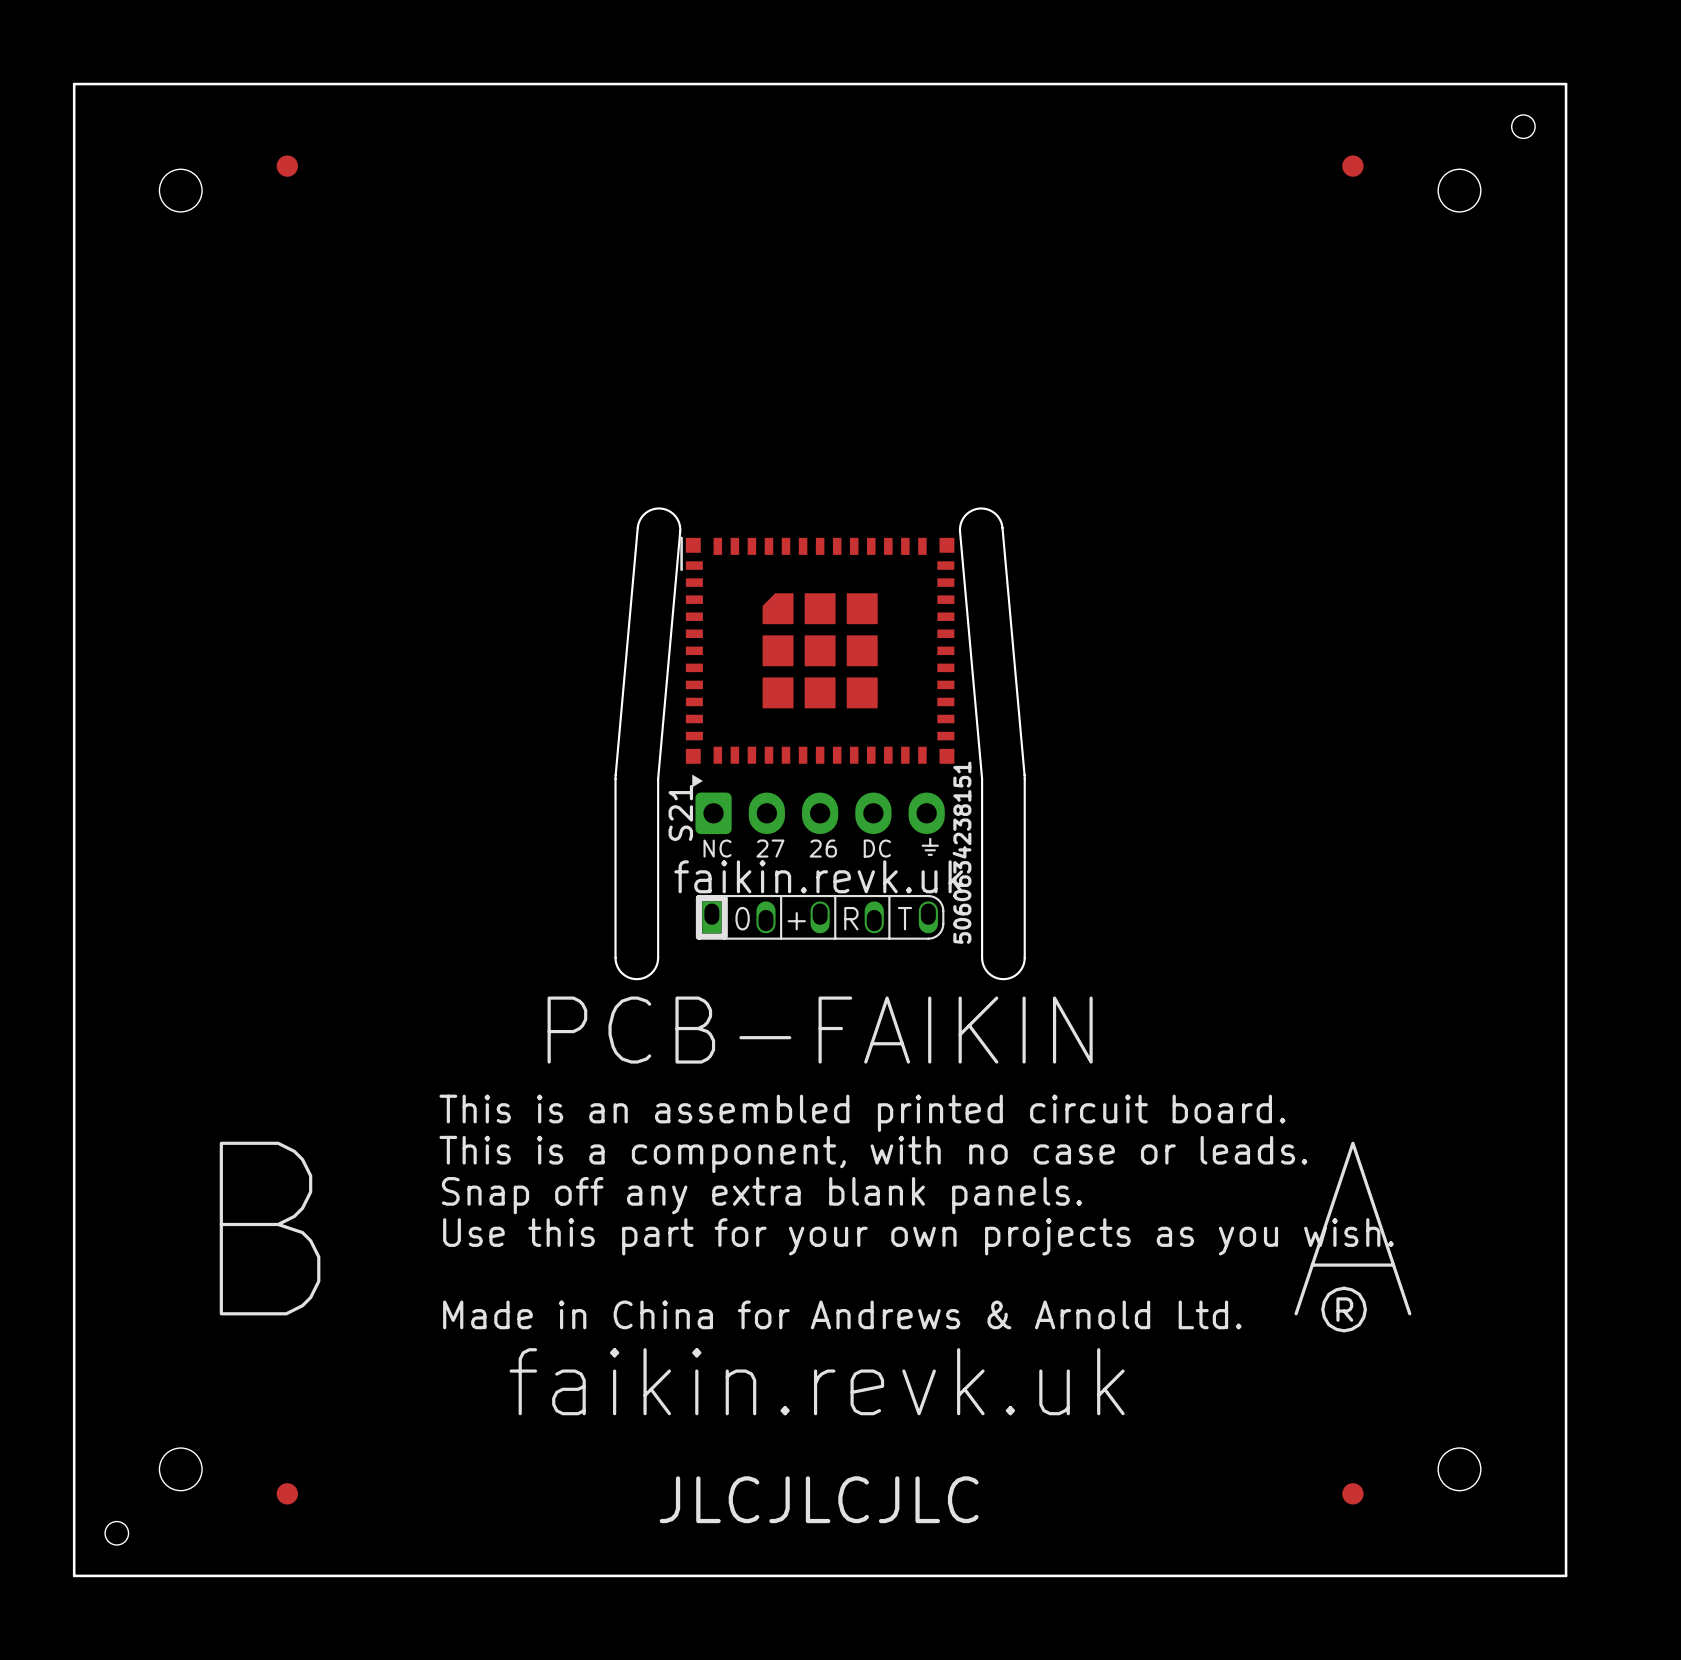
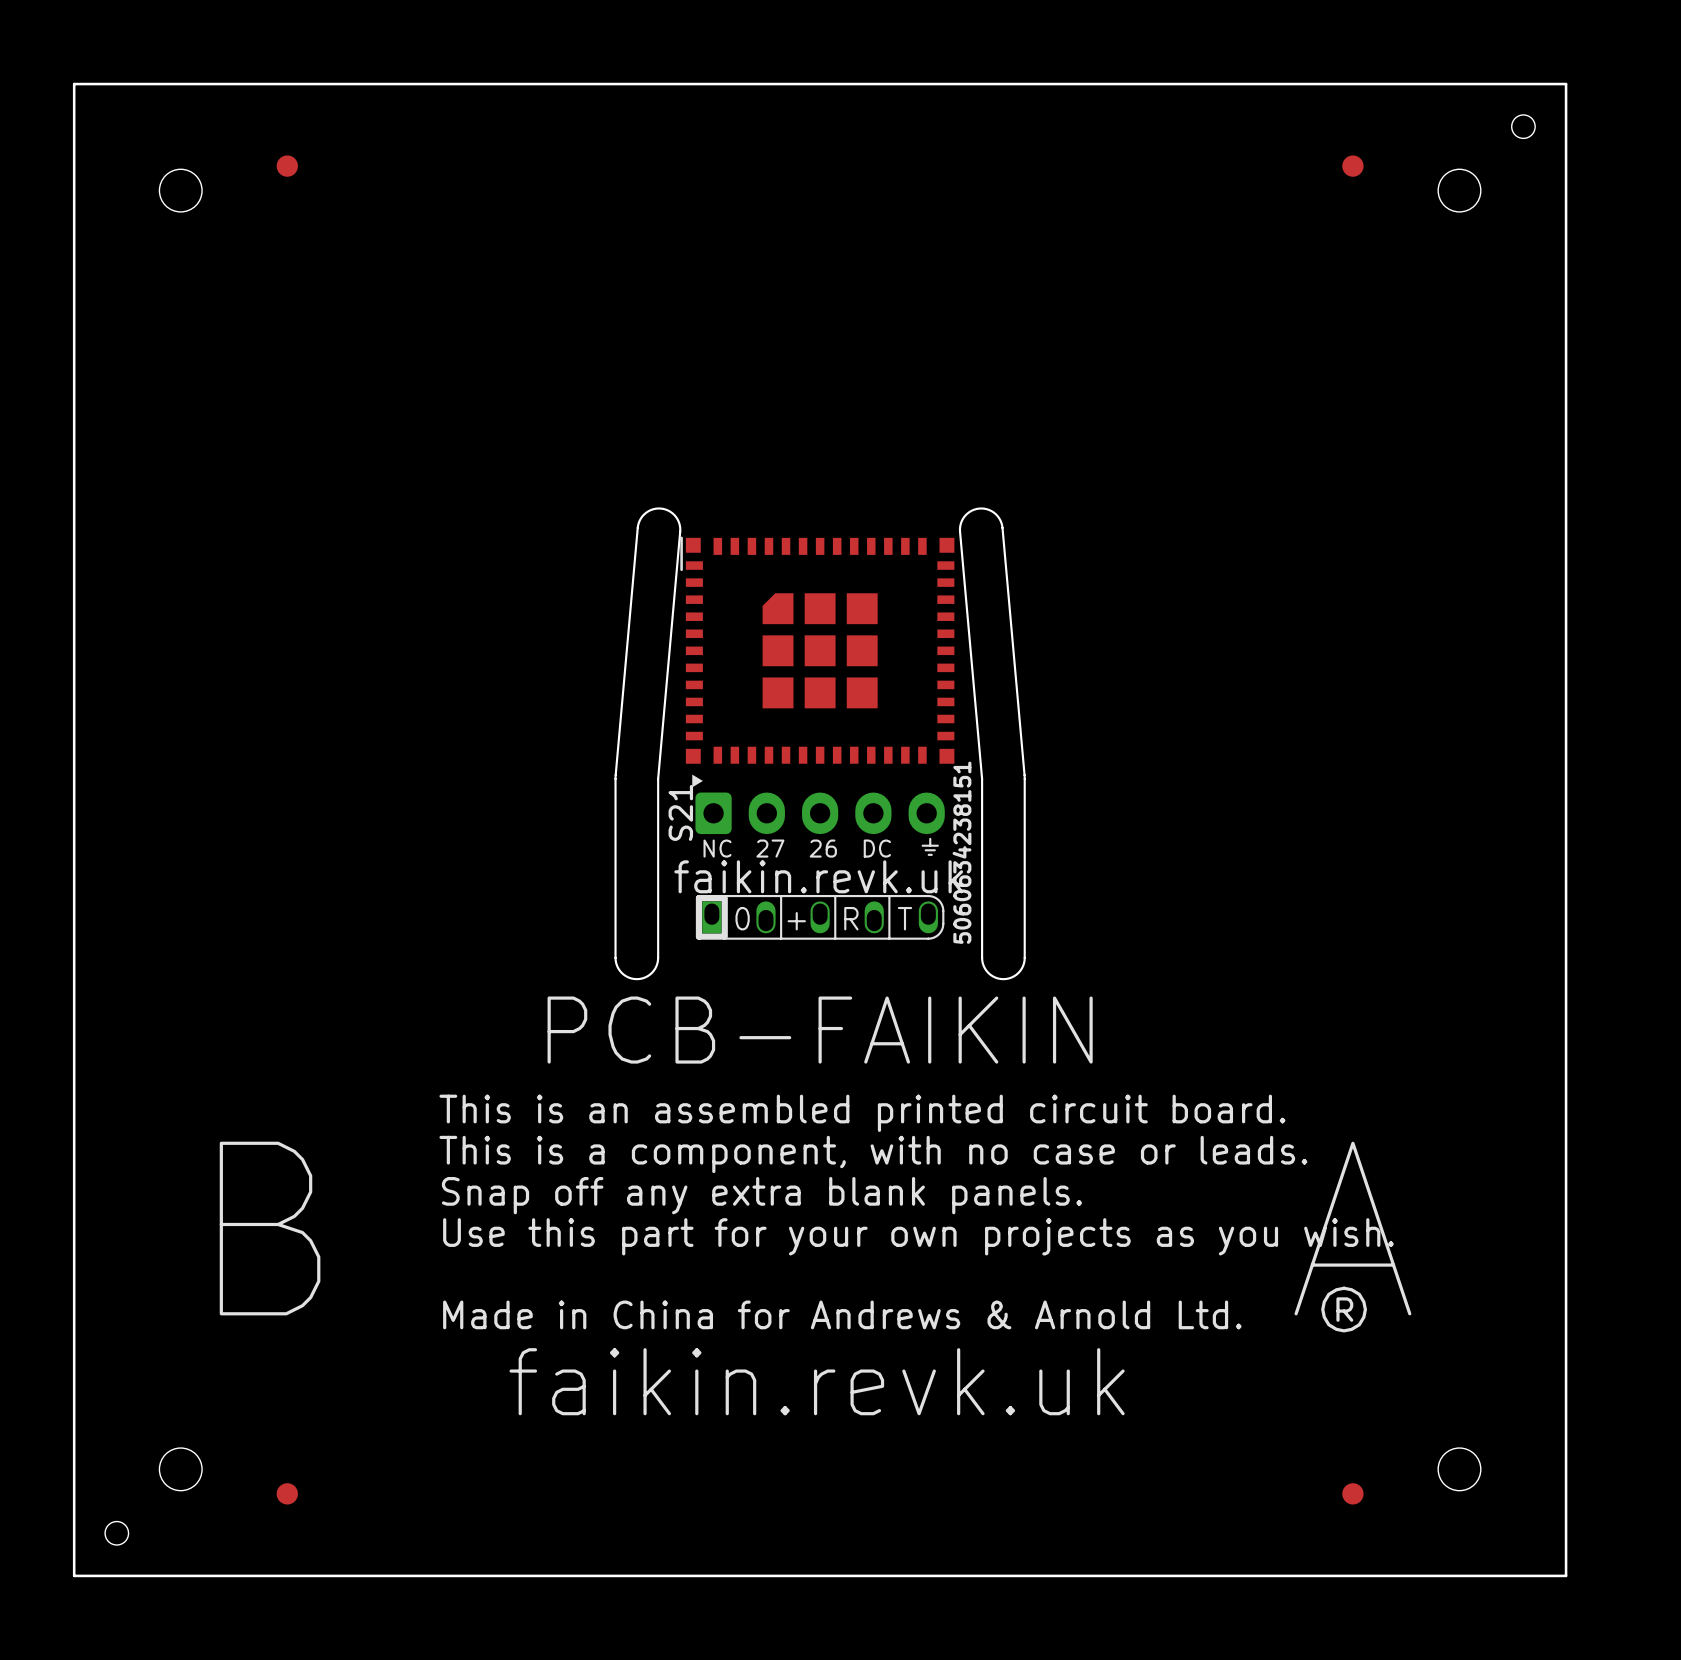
text: JLCJLCJLC (819, 1499) -> none

